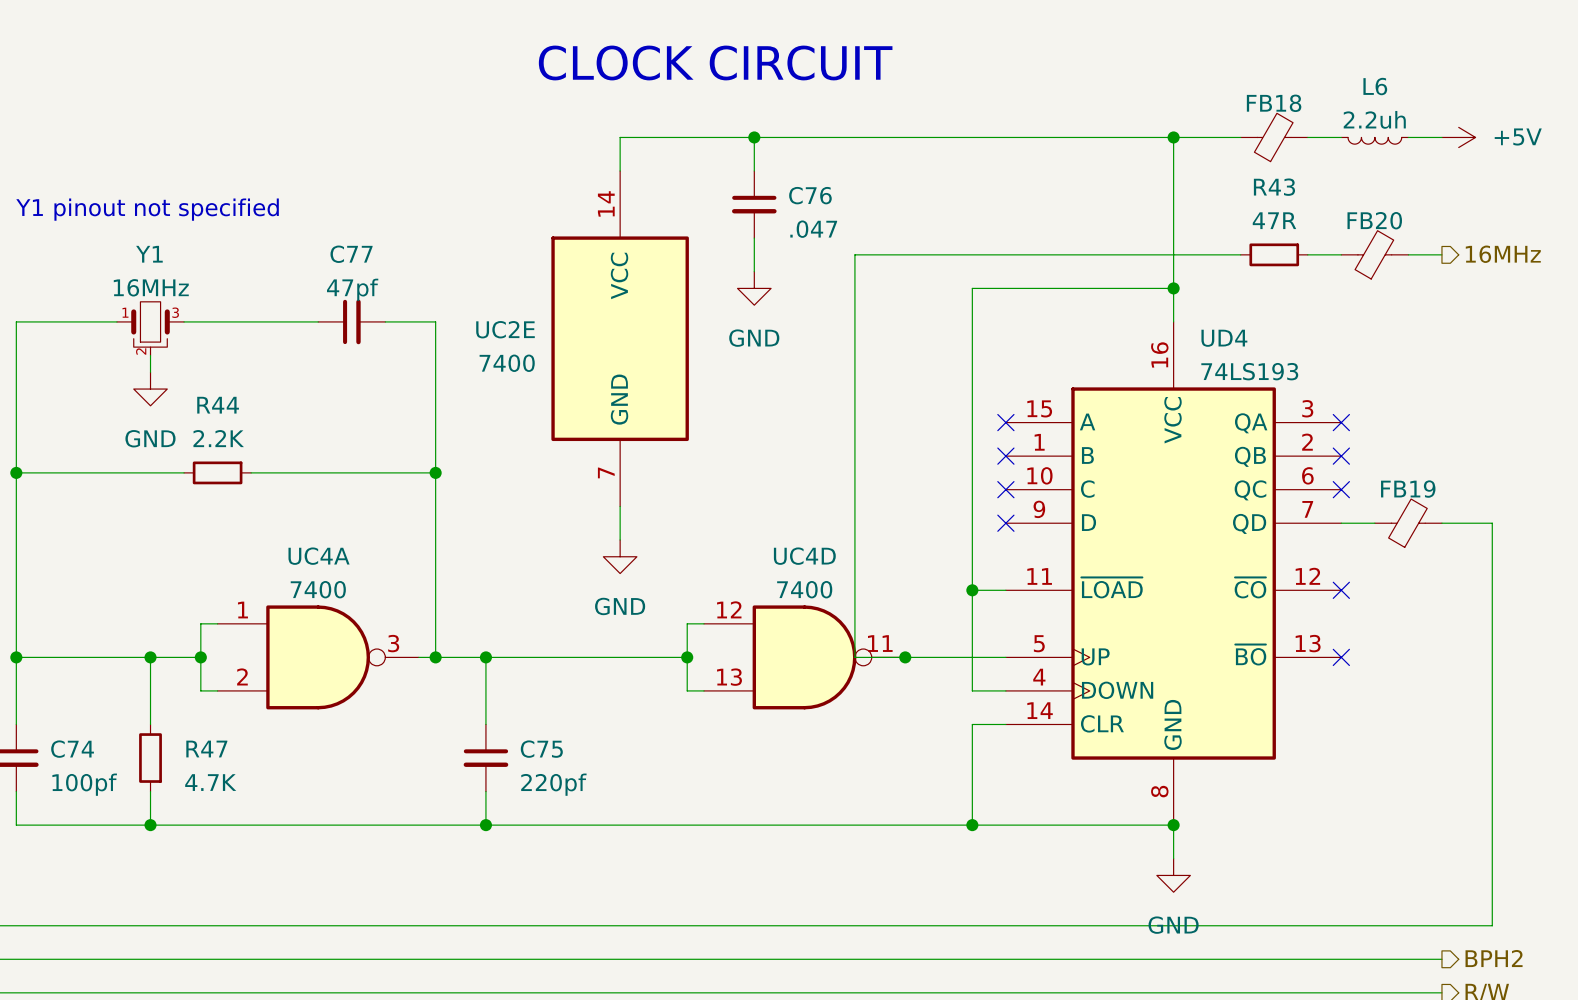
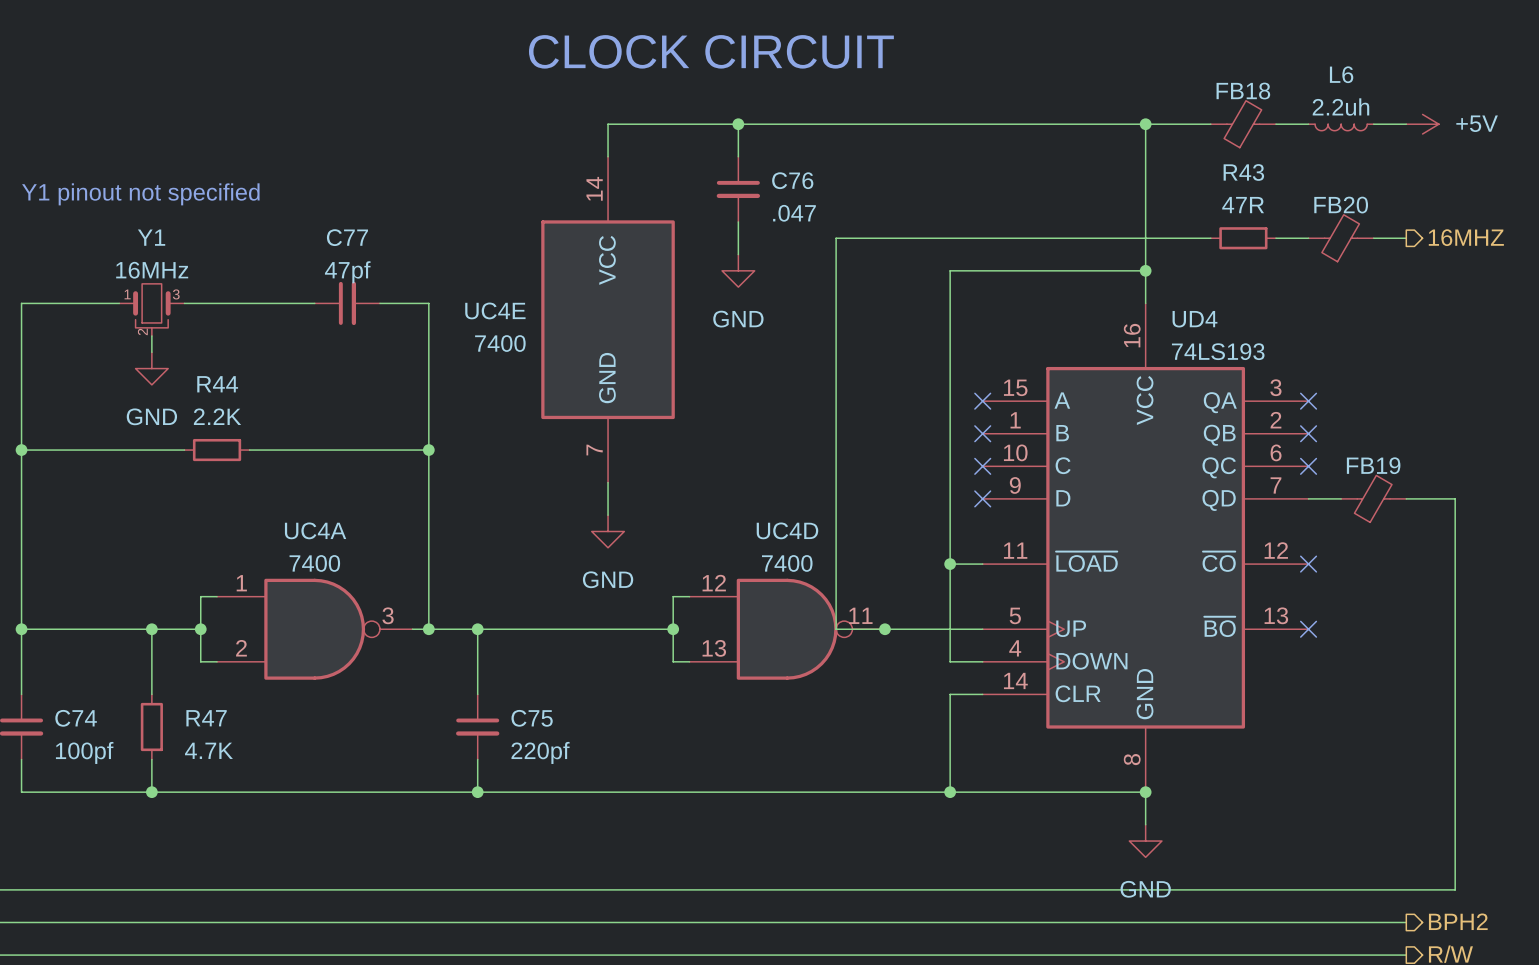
hierarchical label: 16MHz (1503, 254) -> 16MHZ (1466, 237)
UC2E name: UC2E (505, 329) -> UC4E (495, 310)

